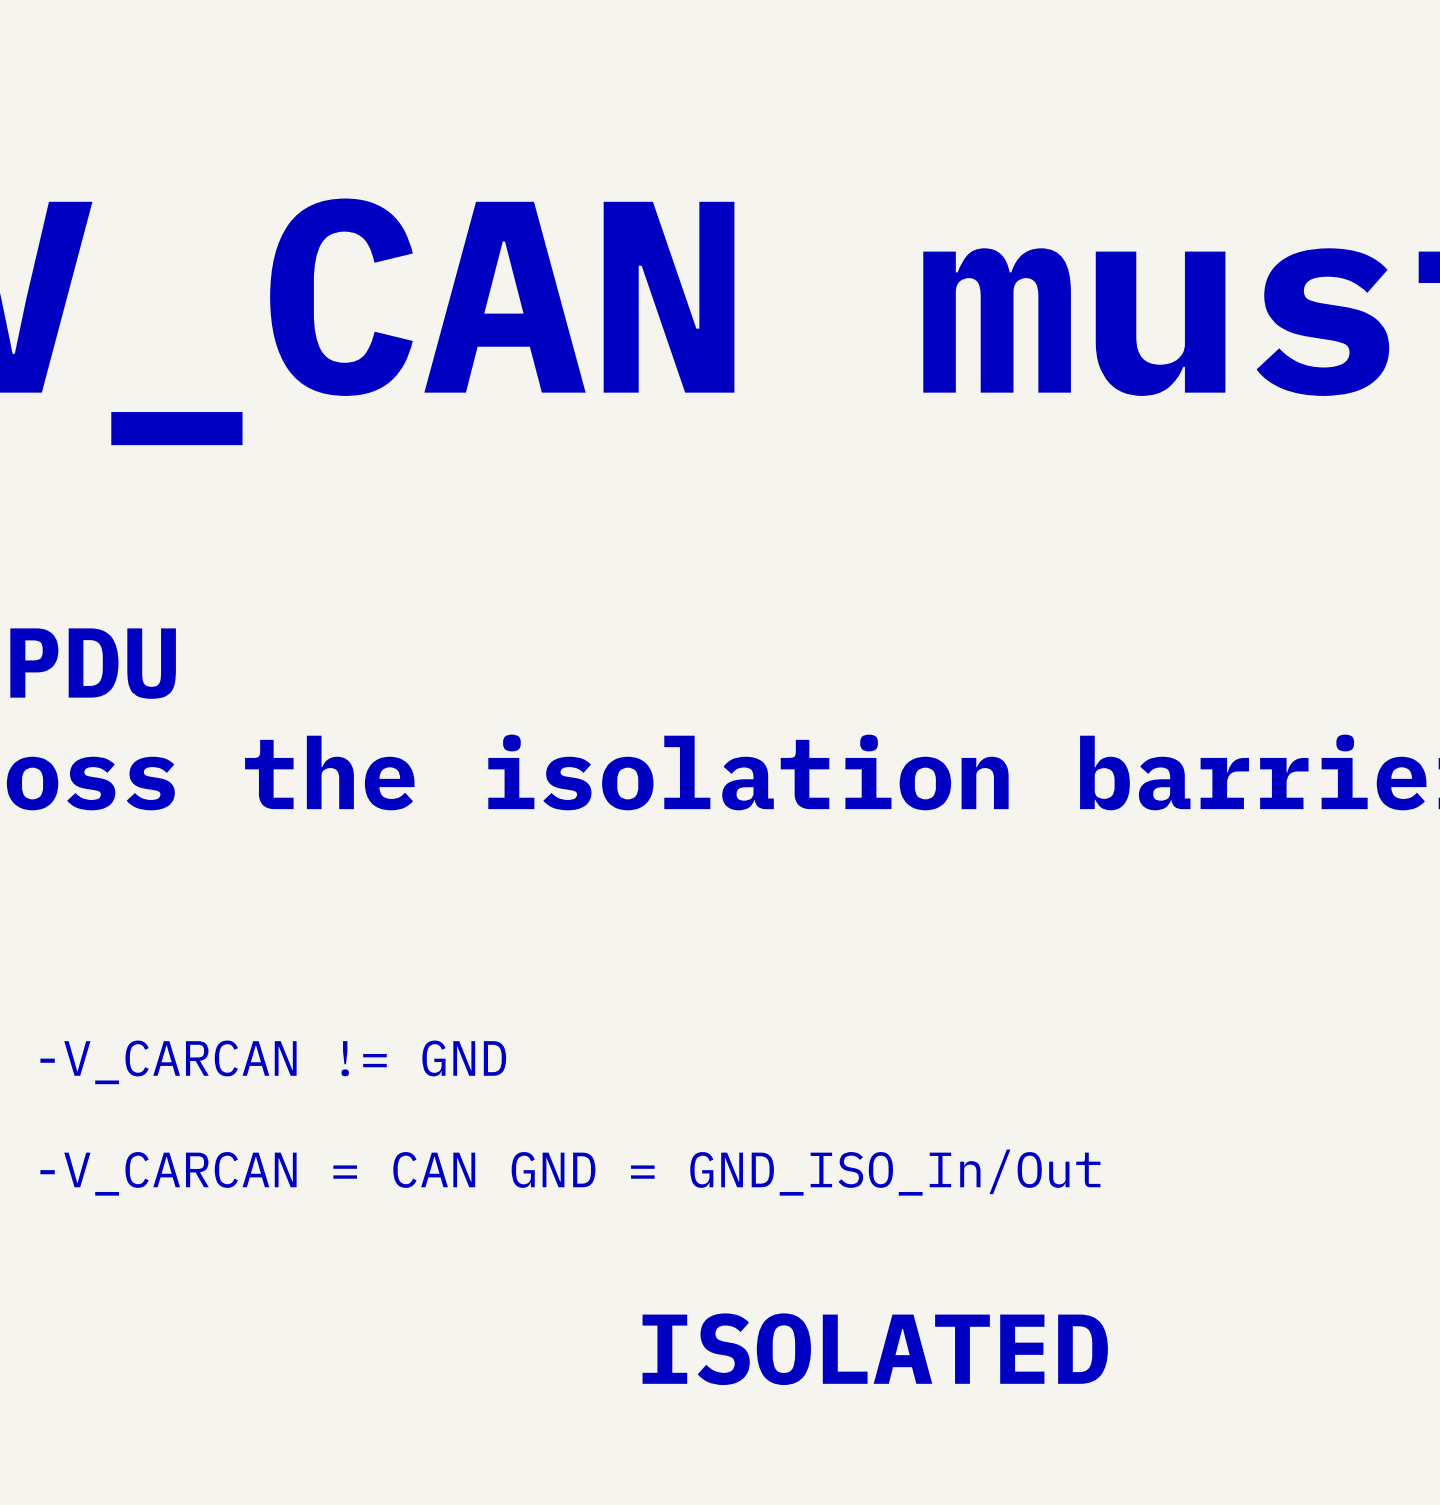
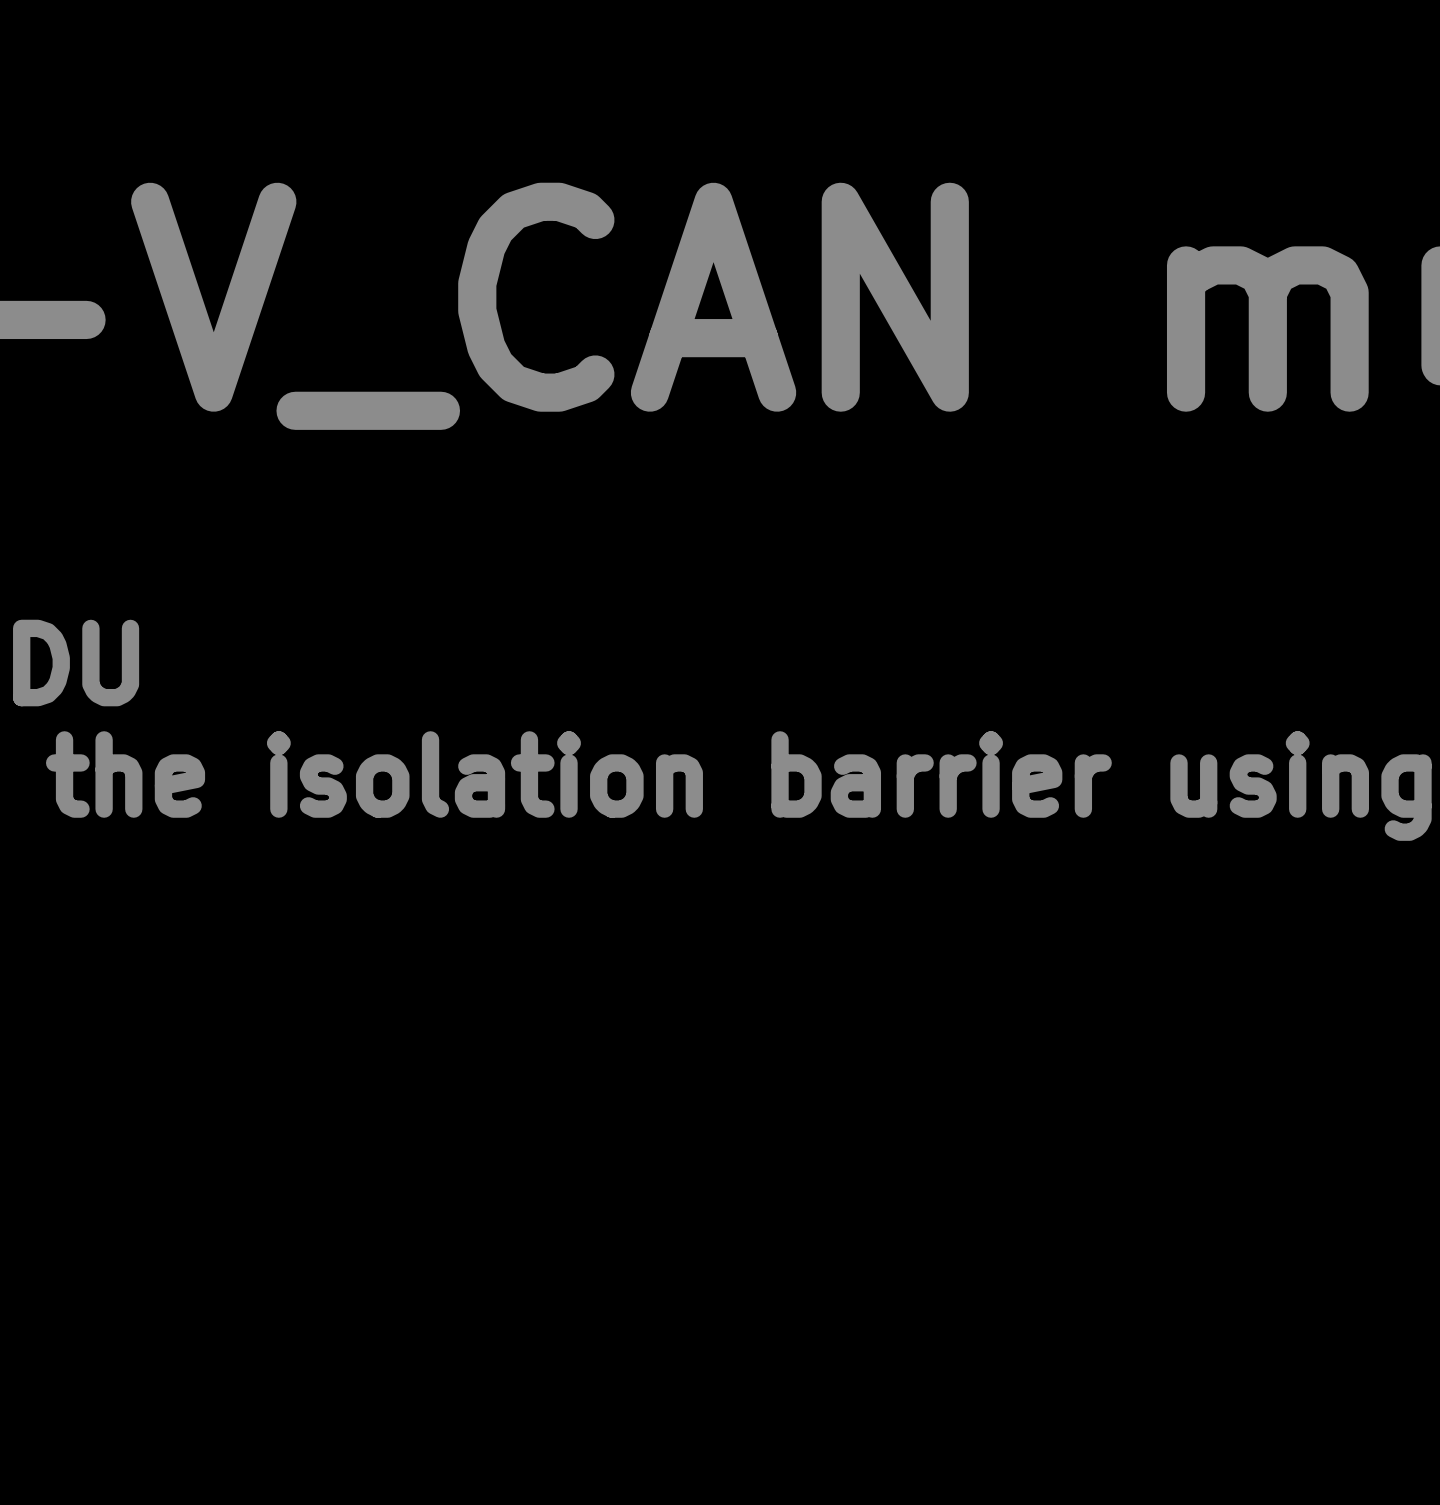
text: -V_CARCAN != GND (273, 1062) -> none
text: -V_CARCAN = CAN GND = GND_ISO_In/Out (570, 1172) -> none
text: ISOLATED (875, 1349) -> none

